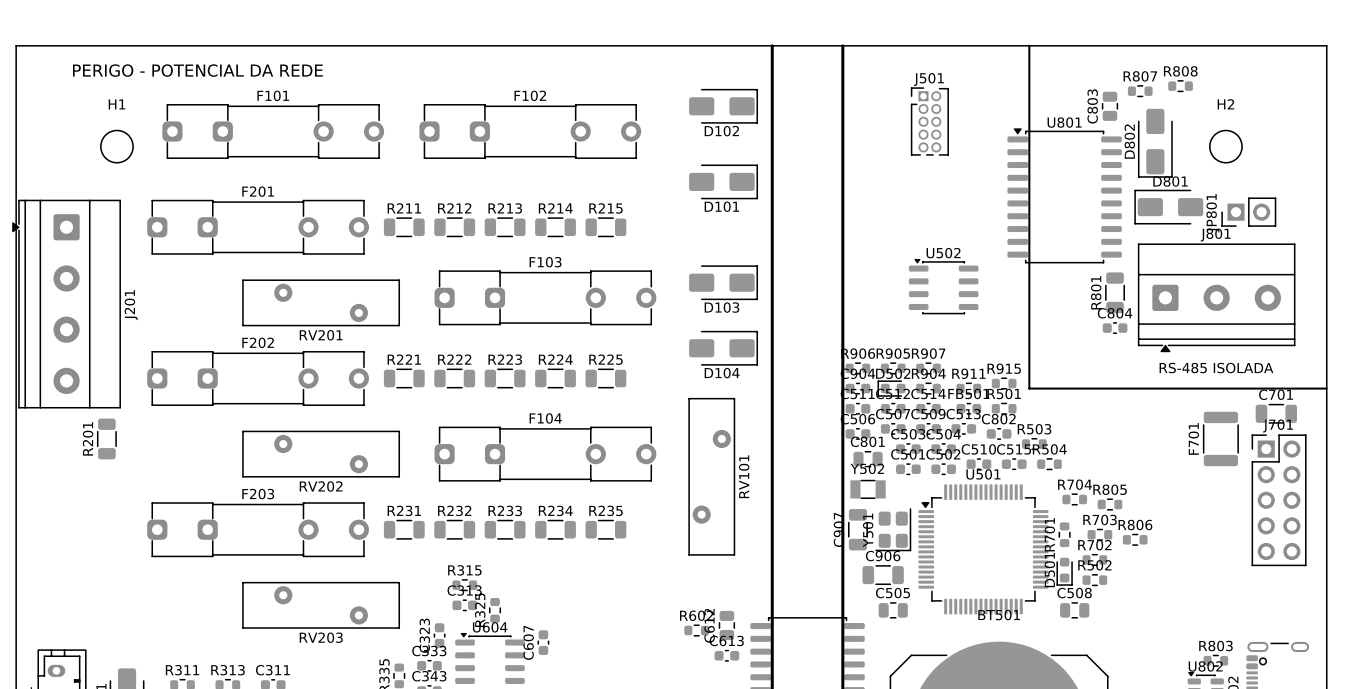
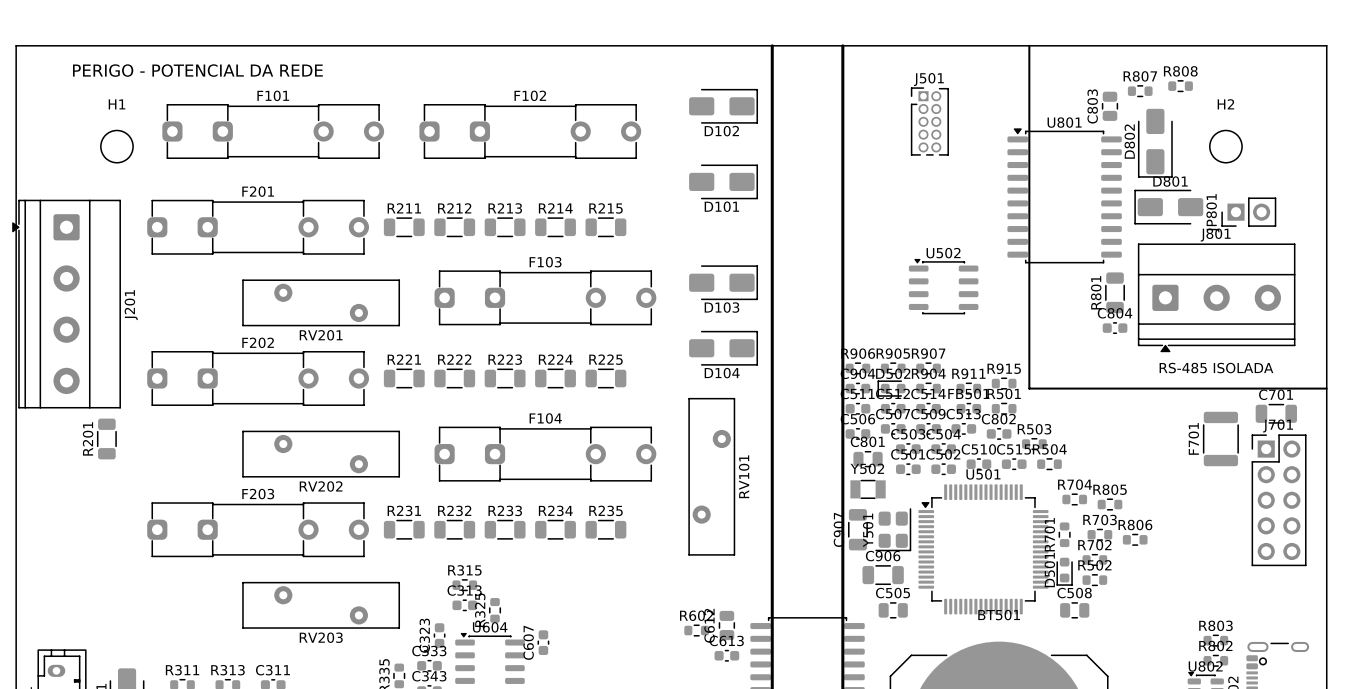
R803: none -> (1215, 640)
R803 name: R803 (1215, 645) -> R802 (1215, 645)

